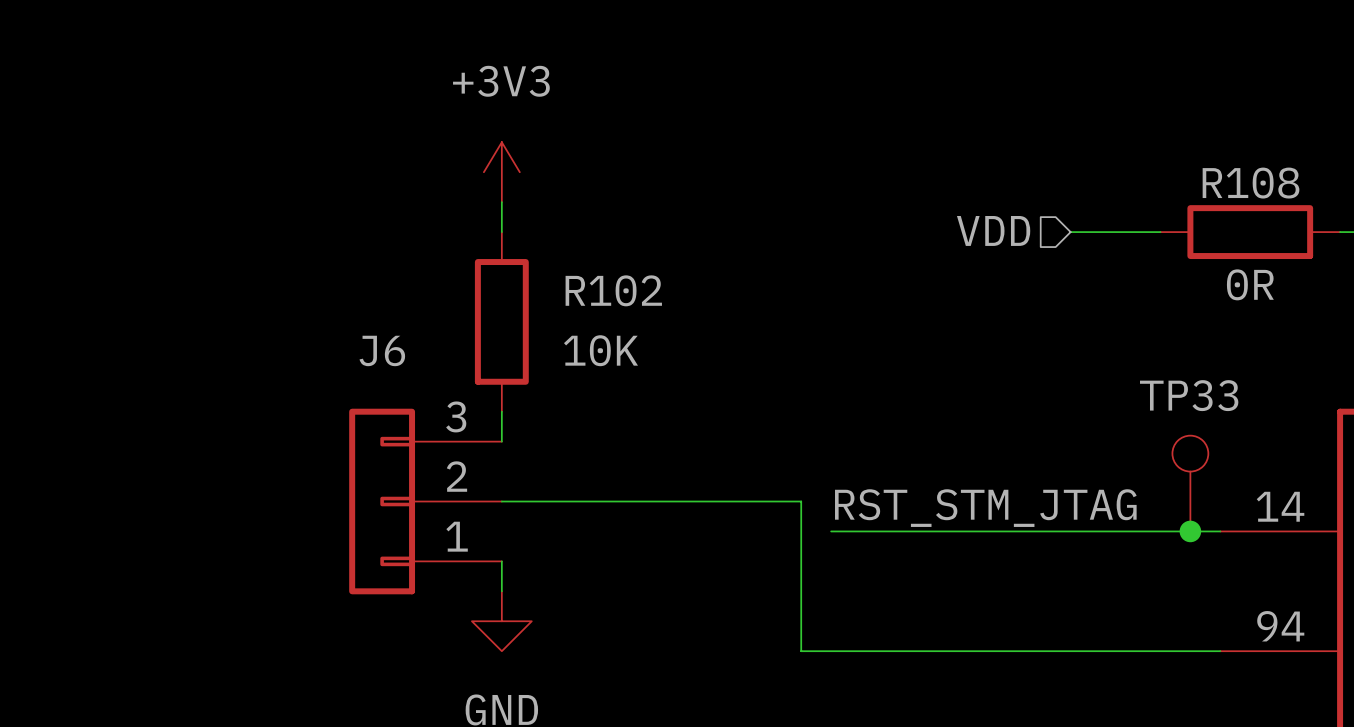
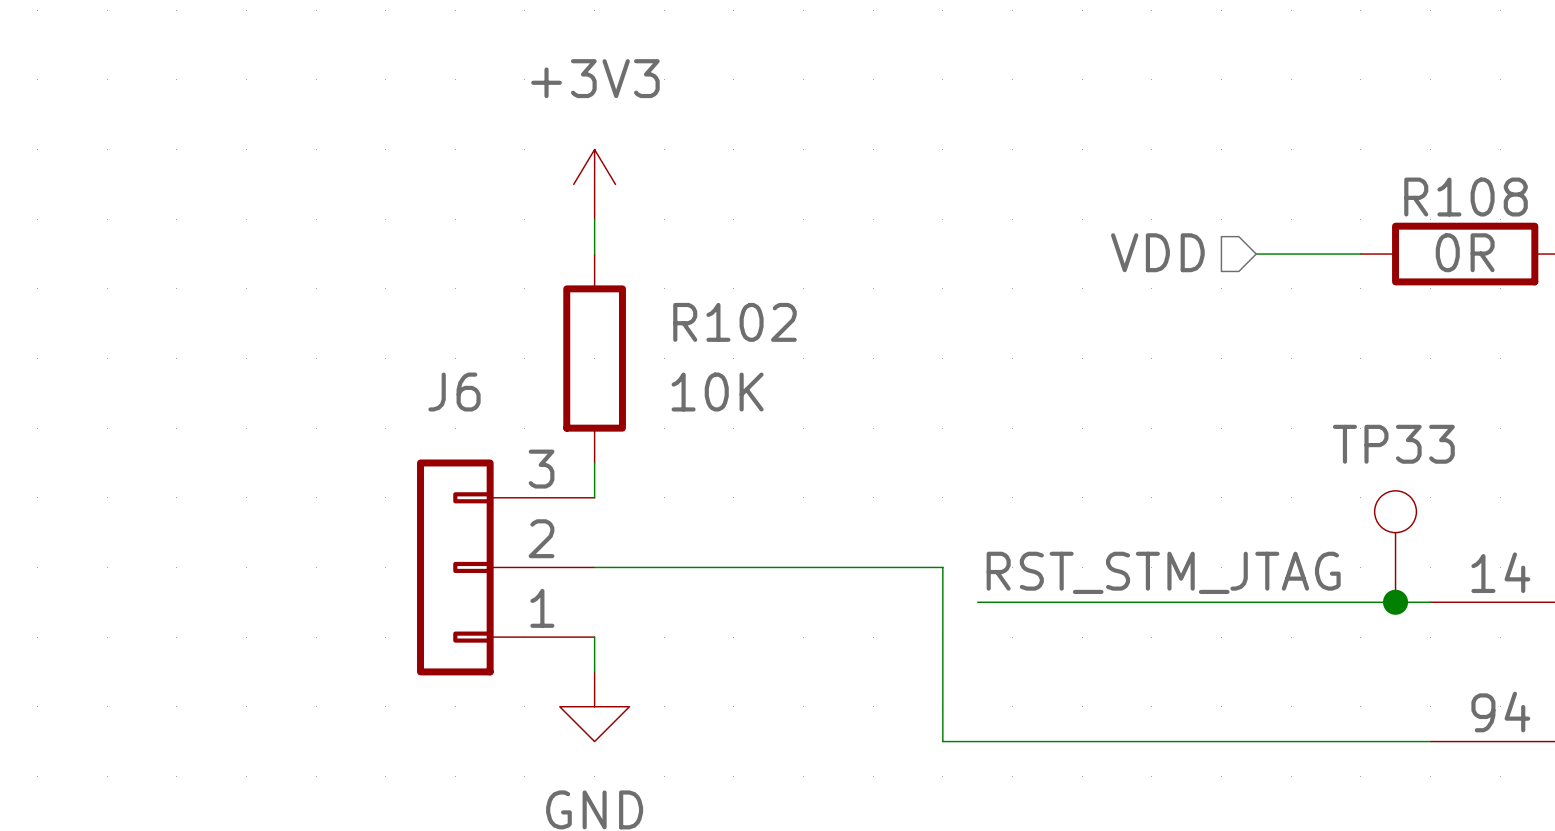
R108 value position: 0R (1250, 284) -> 0R (1465, 252)

